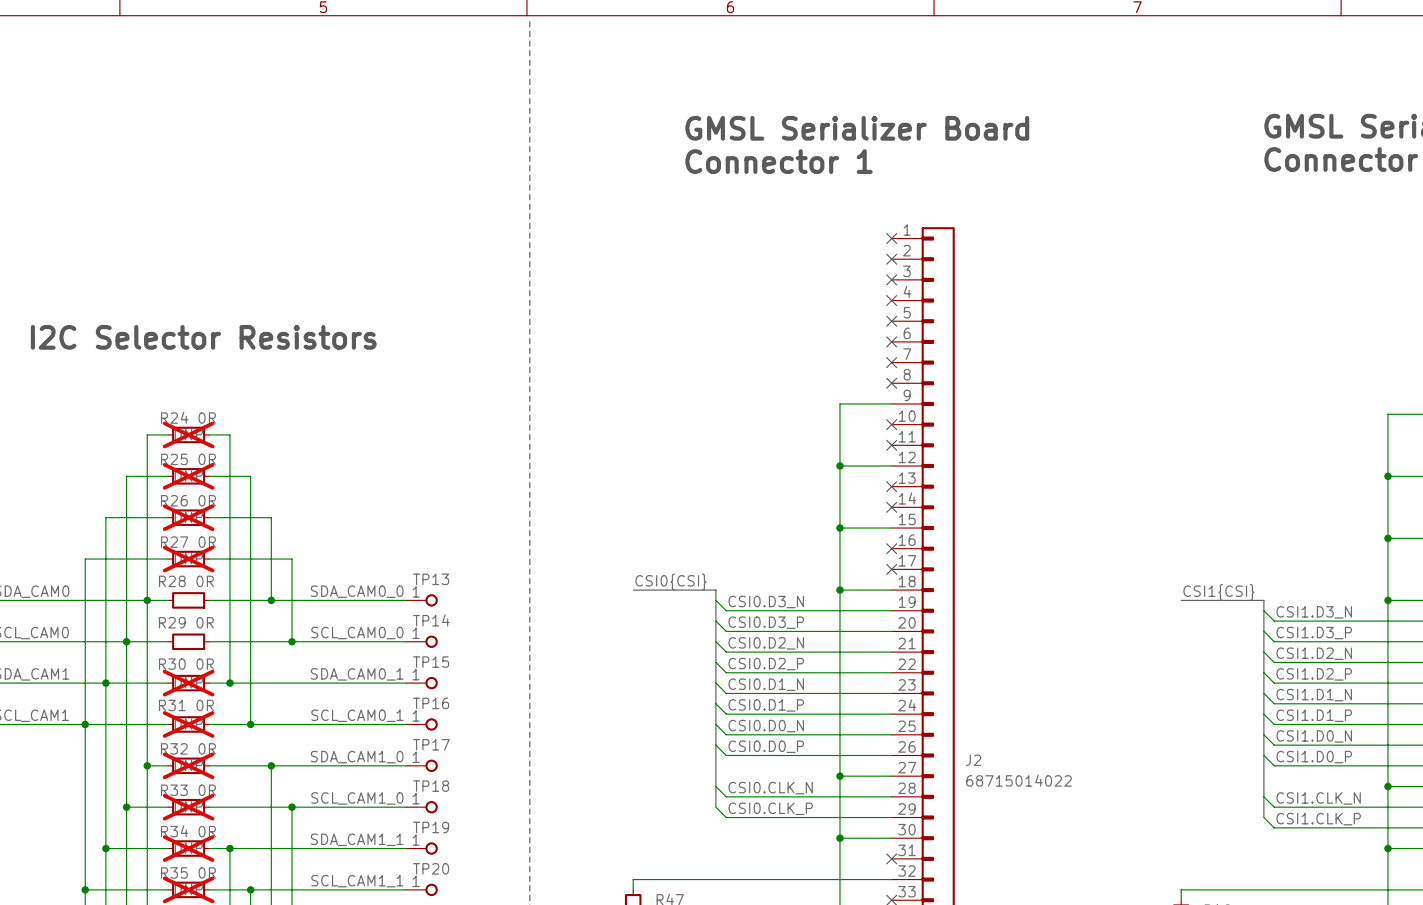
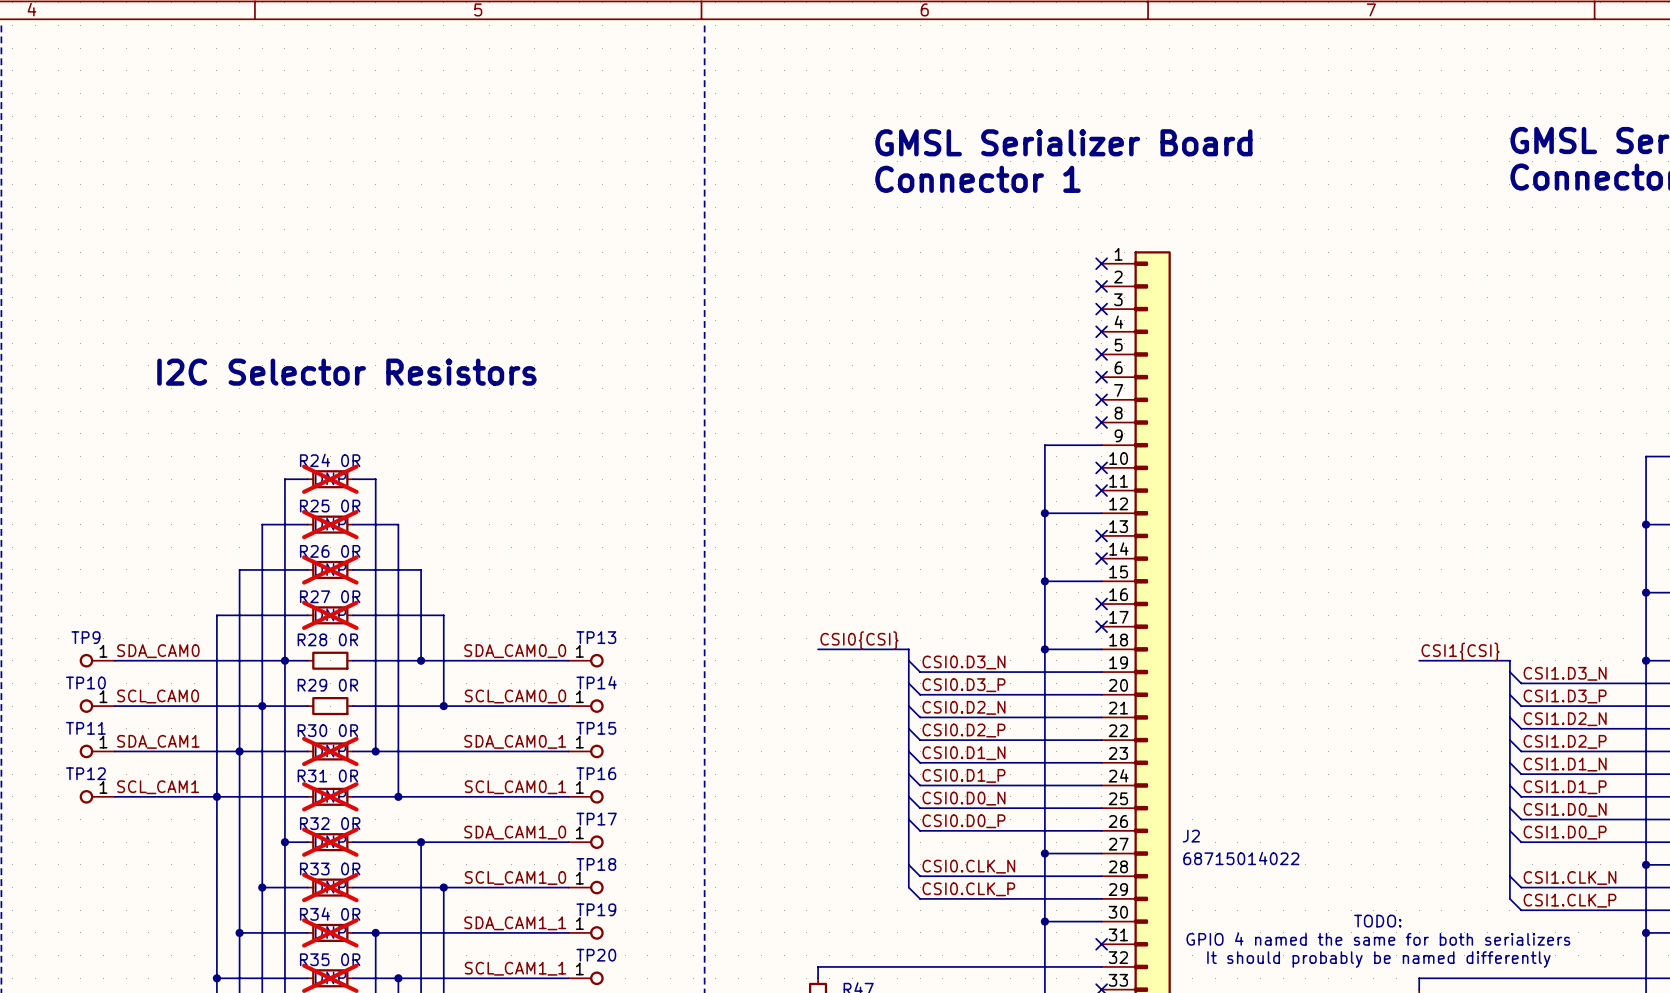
text: none -> TODO: (1377, 921)
text: none -> GPIO 4 named the same for both serializers (1378, 939)
text: none -> It should probably be named differently (1378, 959)

